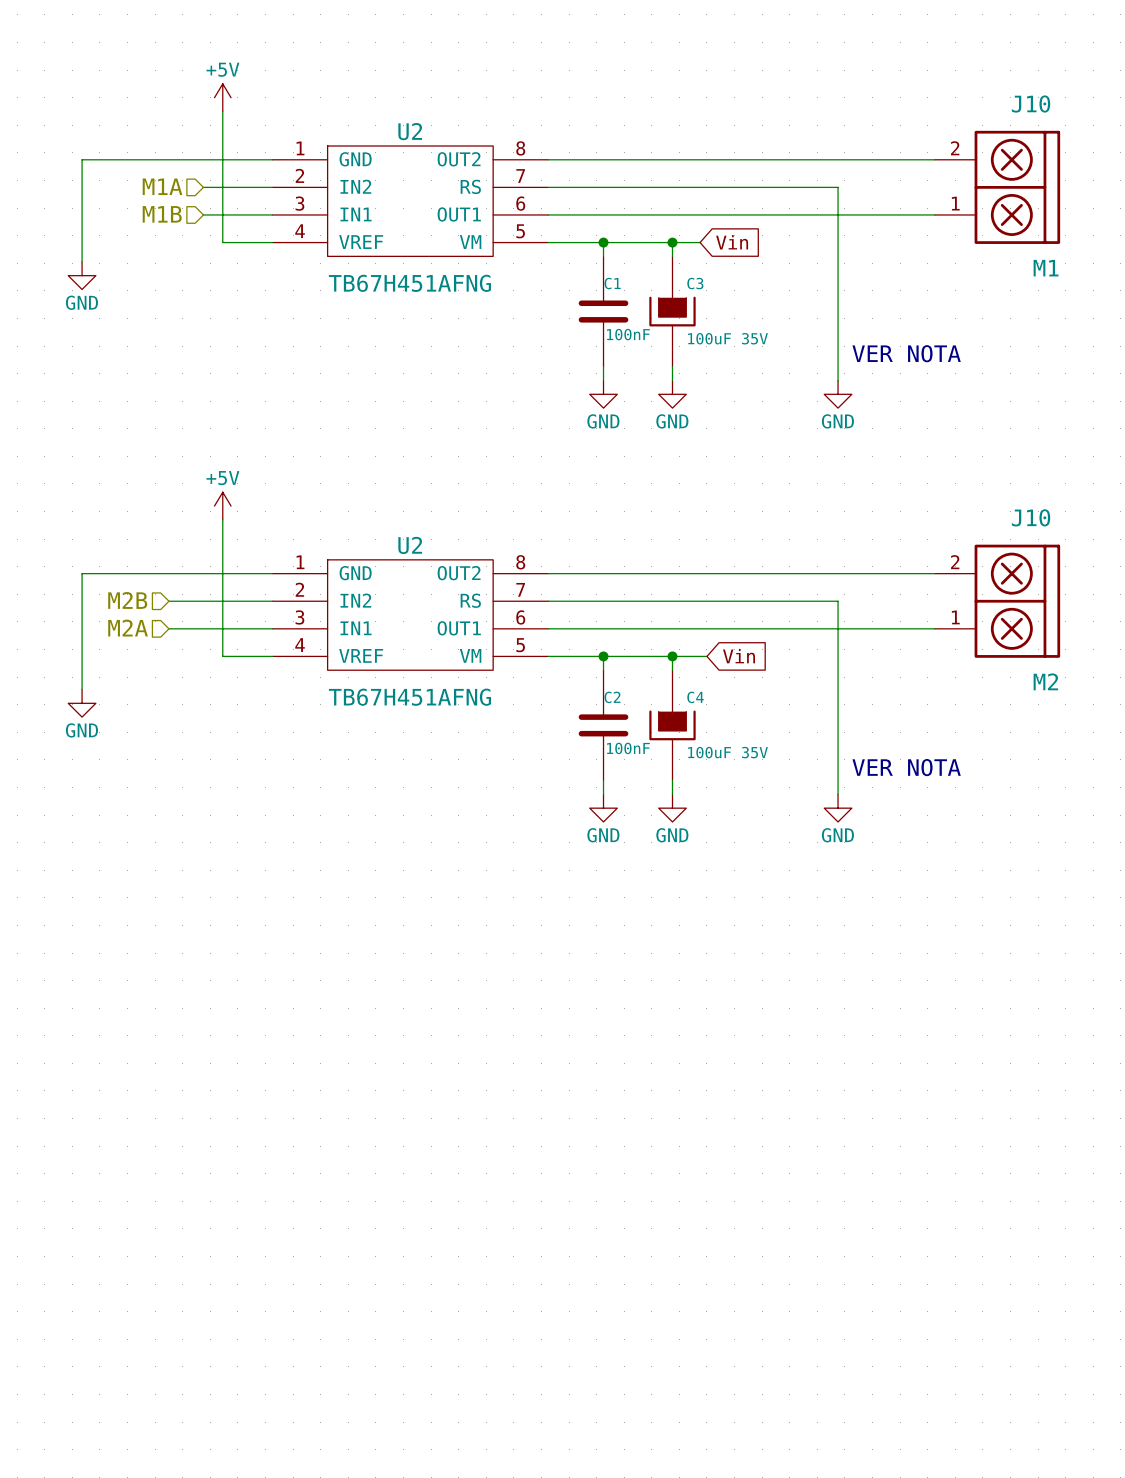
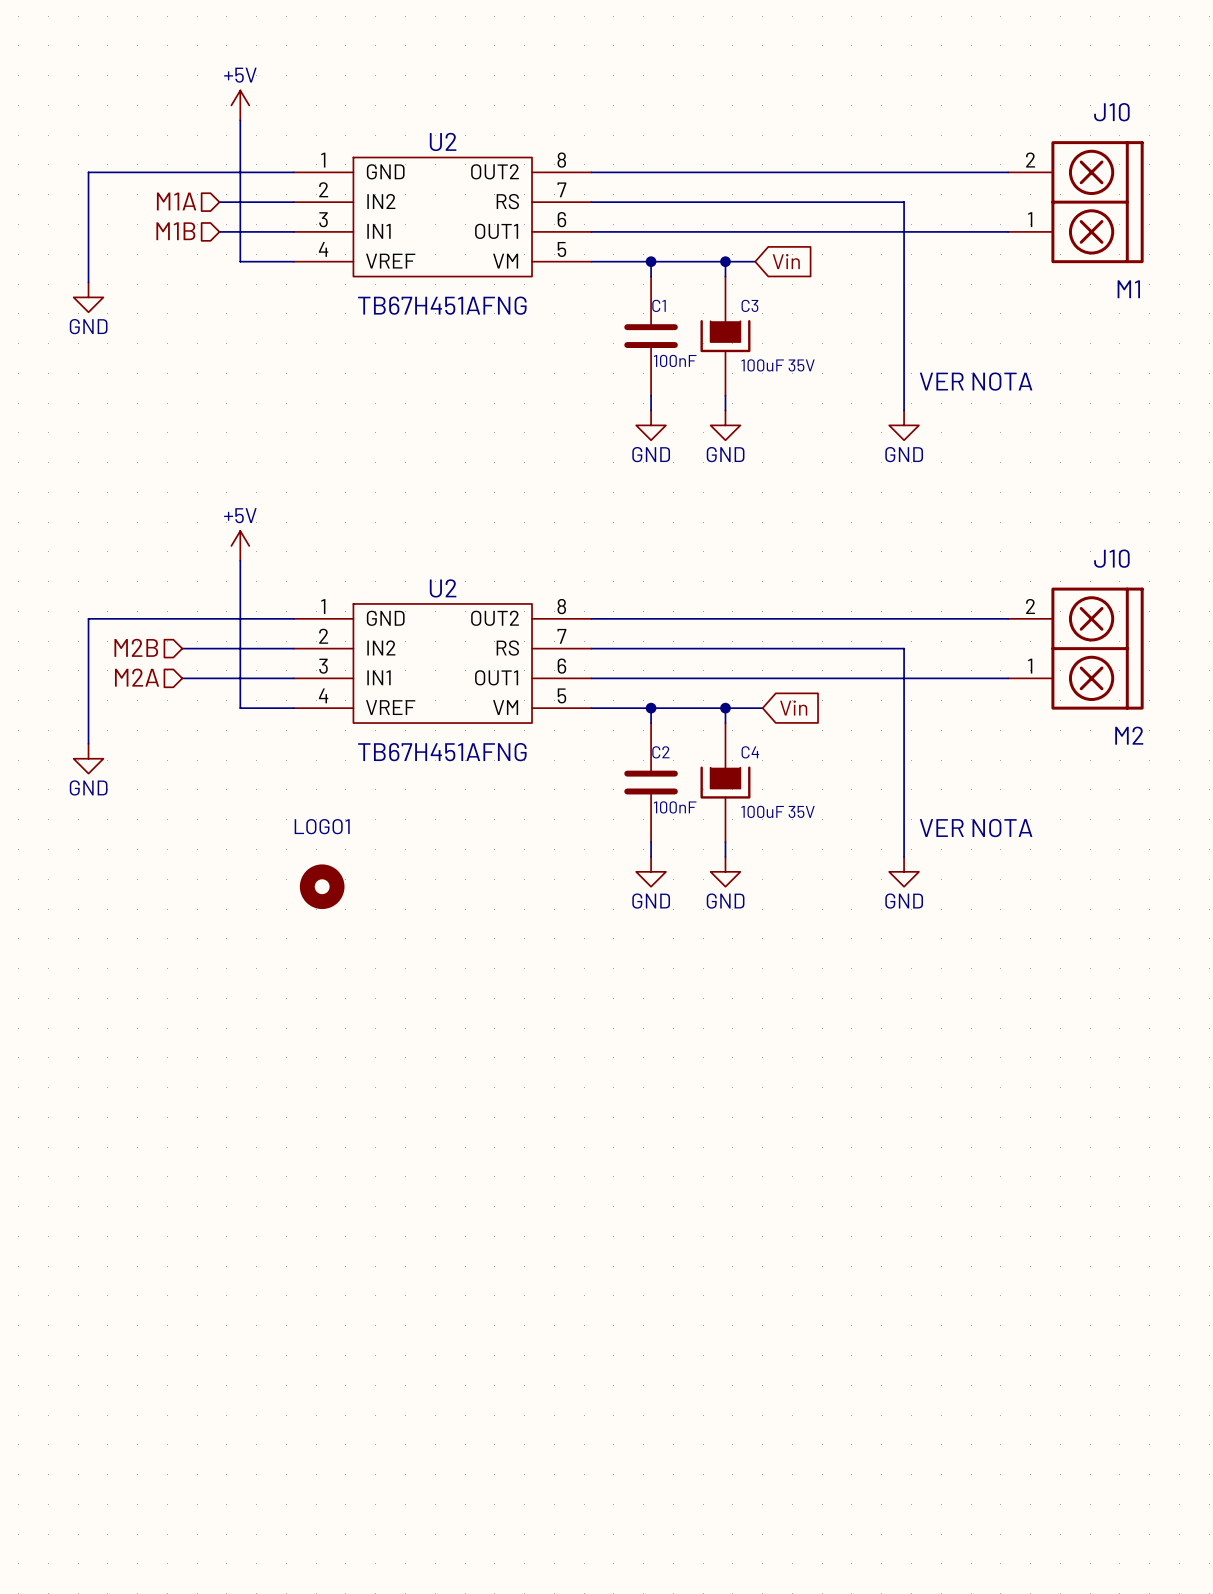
LOGO1: none -> (322, 886)

